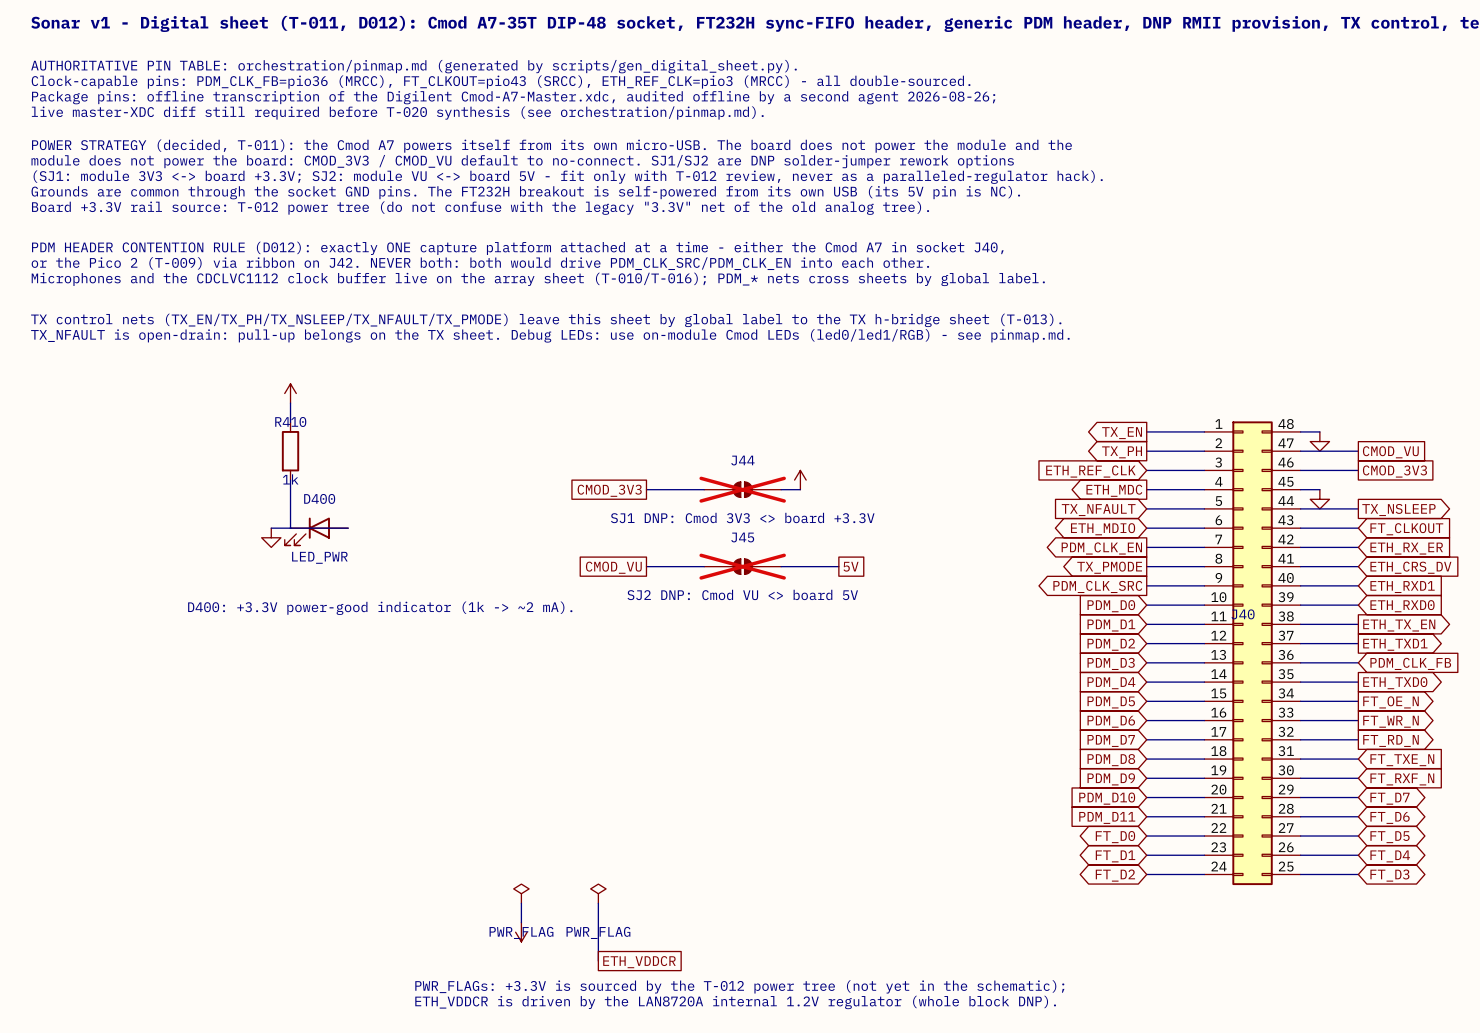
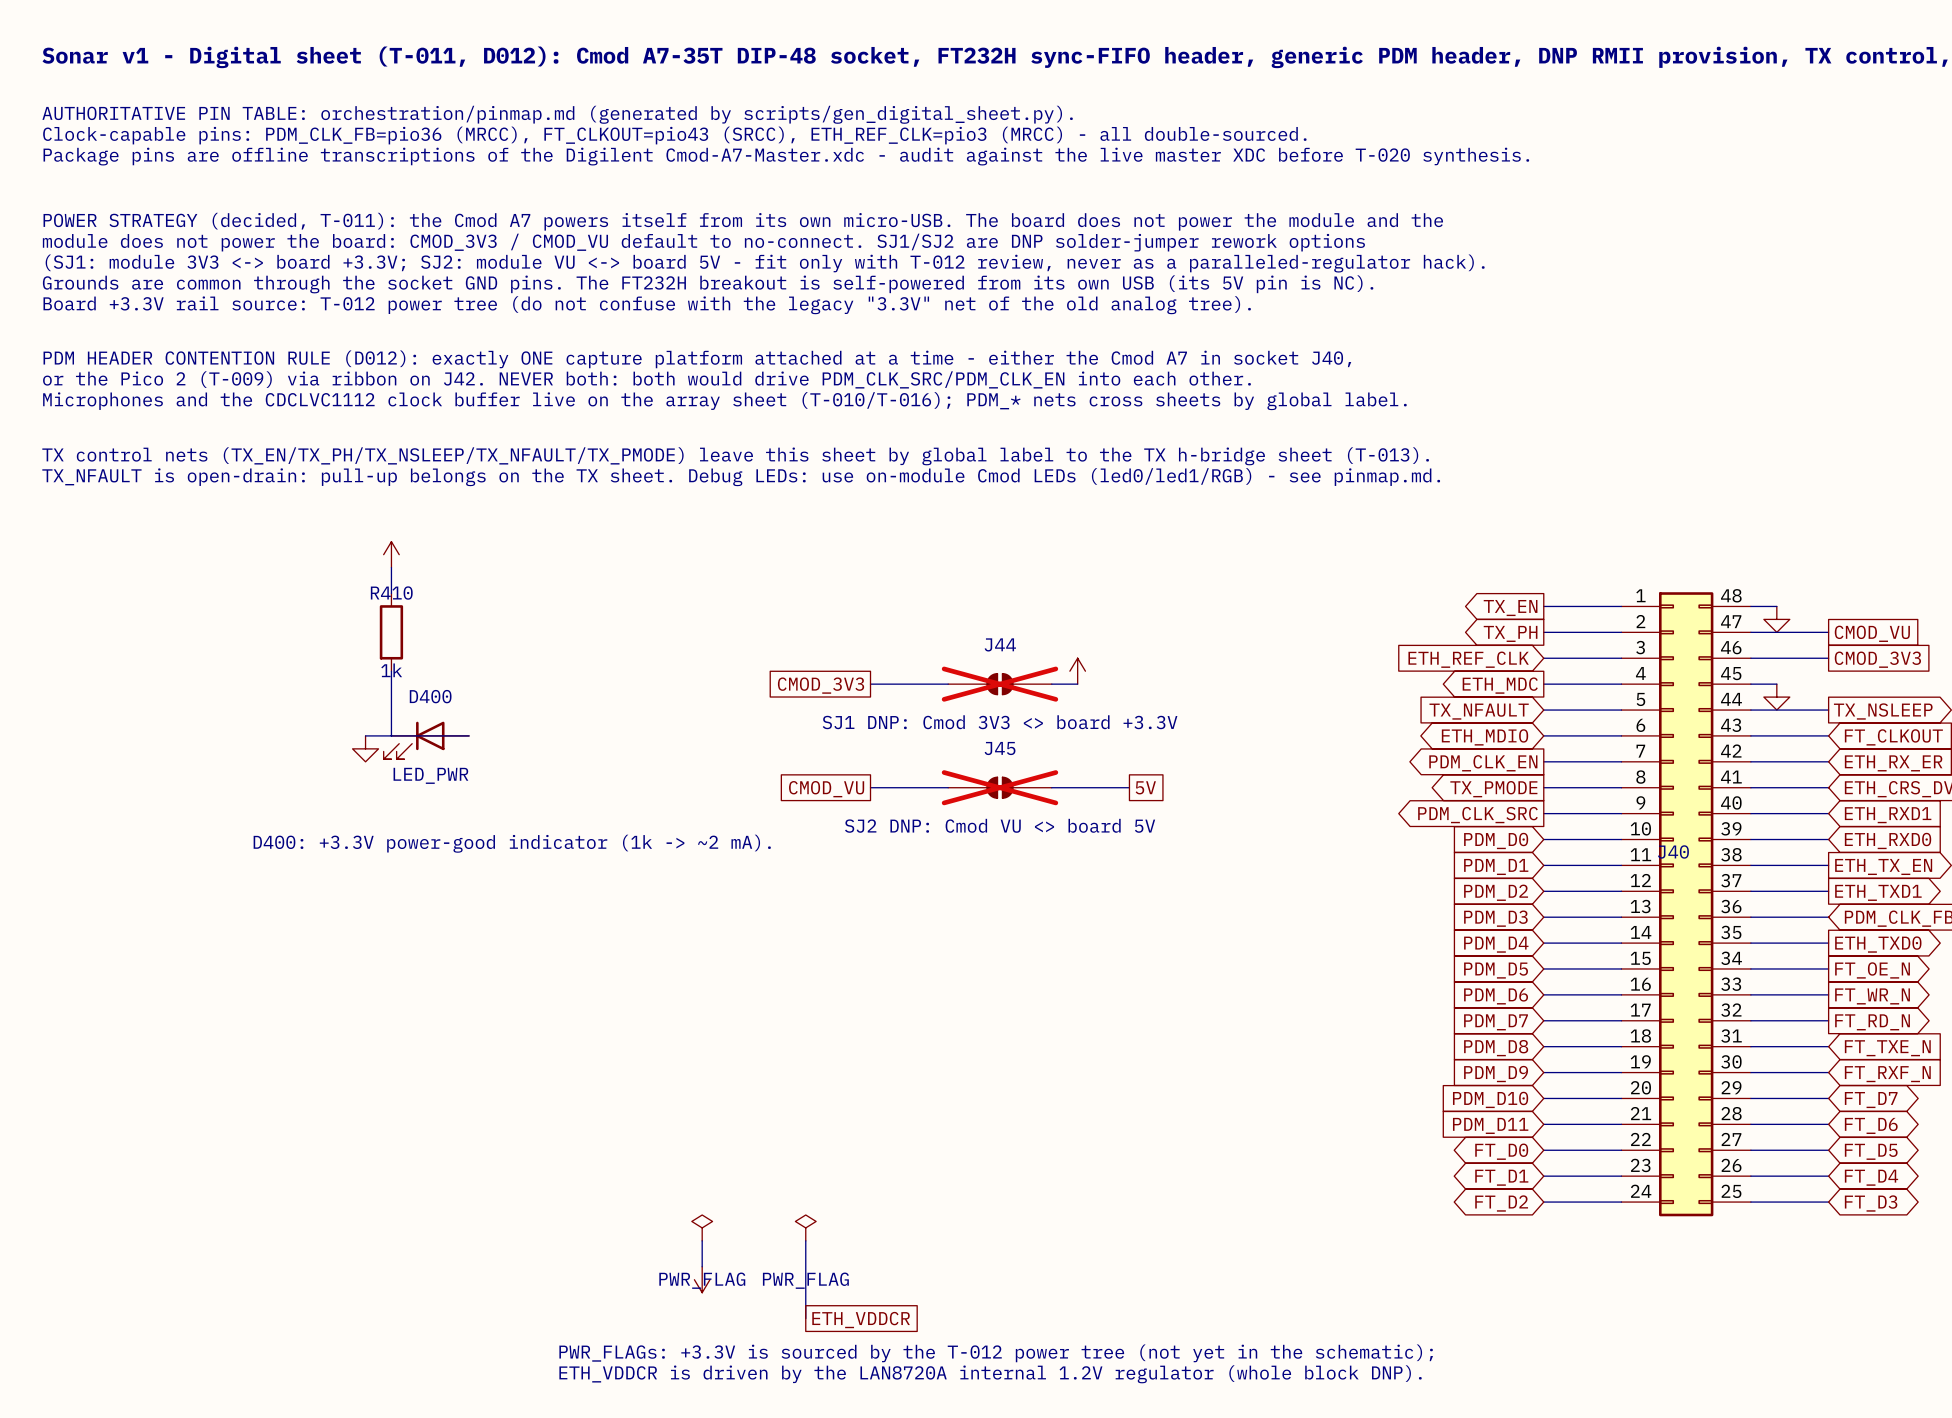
text: Package pins: offline transcription of the Digilent Cmod-A7-Master.xdc, audited offline by a second agent 2026-08-26; (513, 97) -> Package pins are offline transcriptions of the Digilent Cmod-A7-Master.xdc - audit against the live master XDC before T-020 synthesis. (786, 156)
text: live master-XDC diff still required before T-020 synthesis (see orchestration/pinmap.md). (397, 113) -> none

